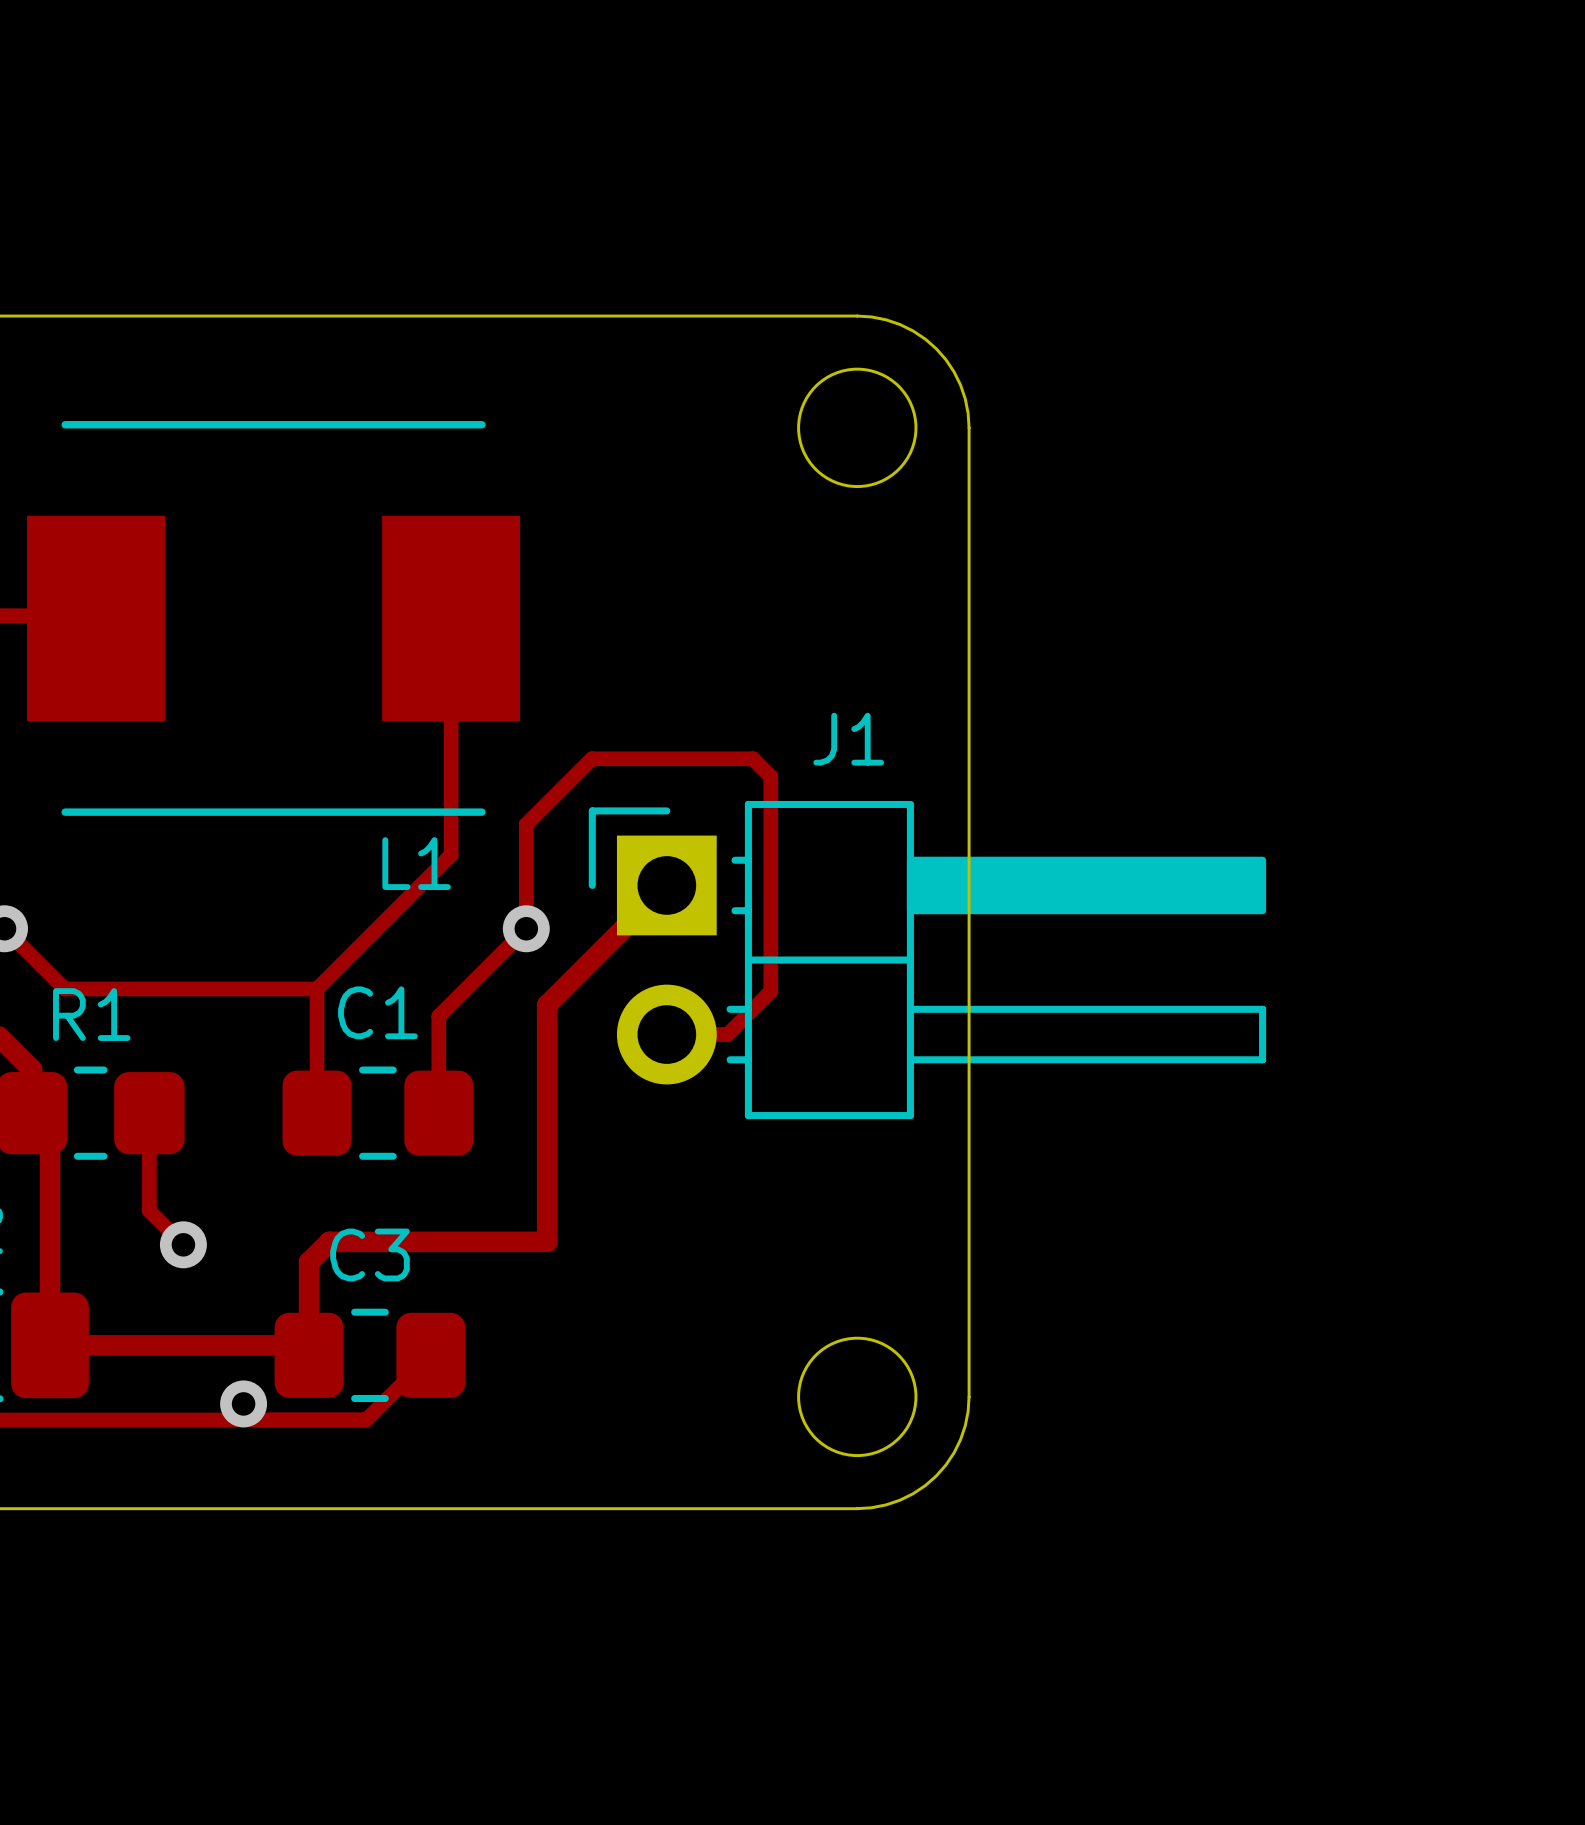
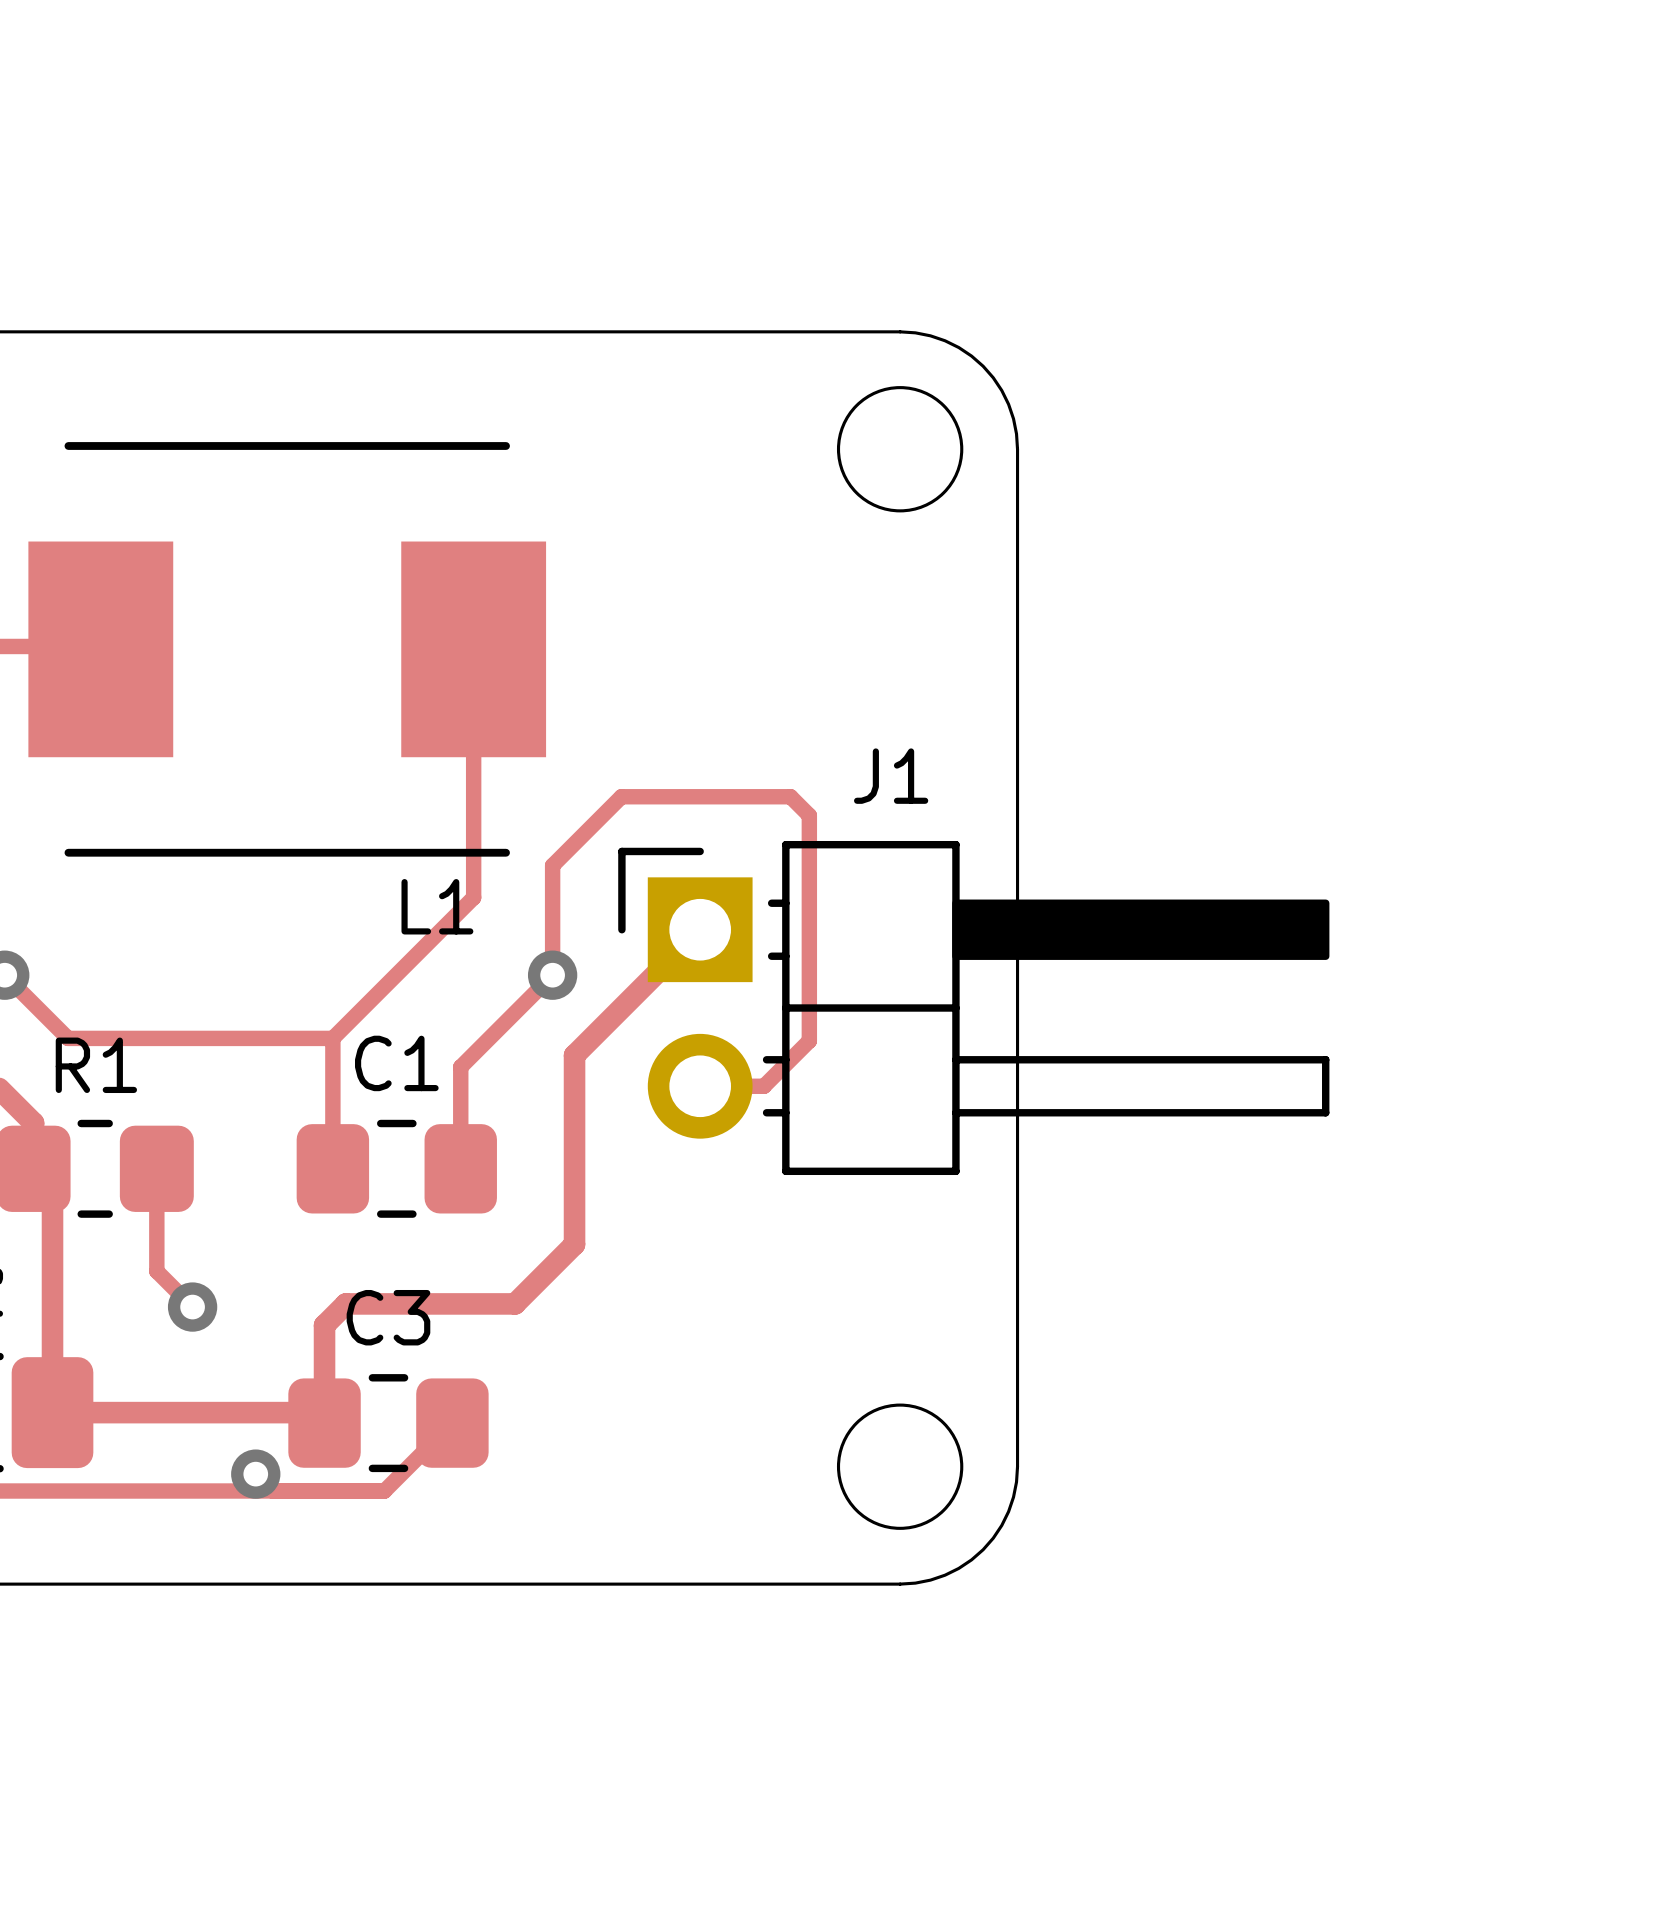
track: (547, 1185) (547, 1241) (490, 1241) -> (574, 1244) (515, 1303)

